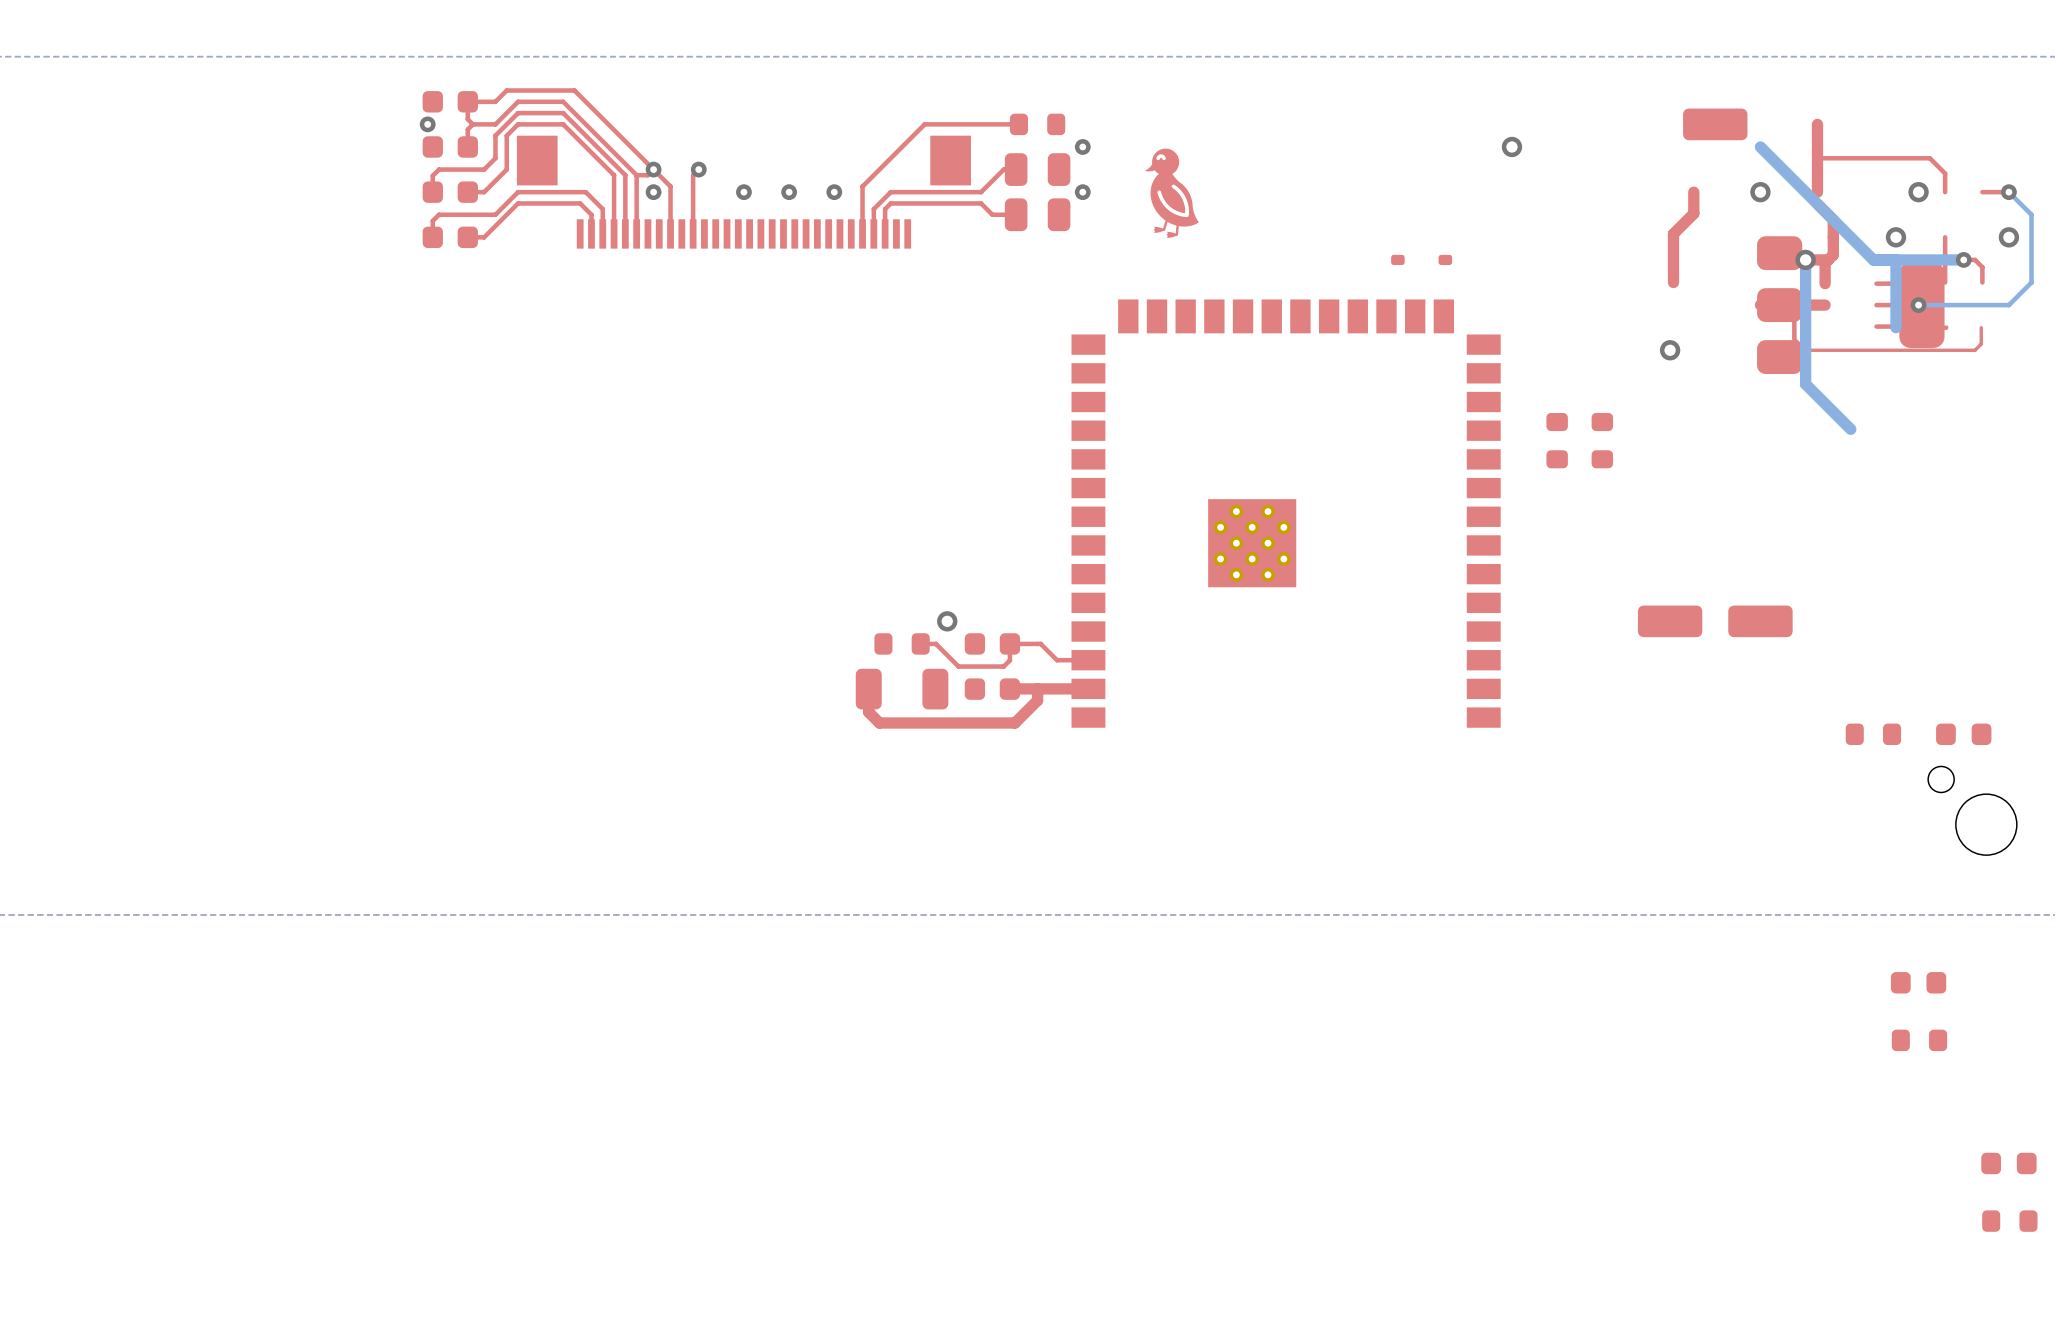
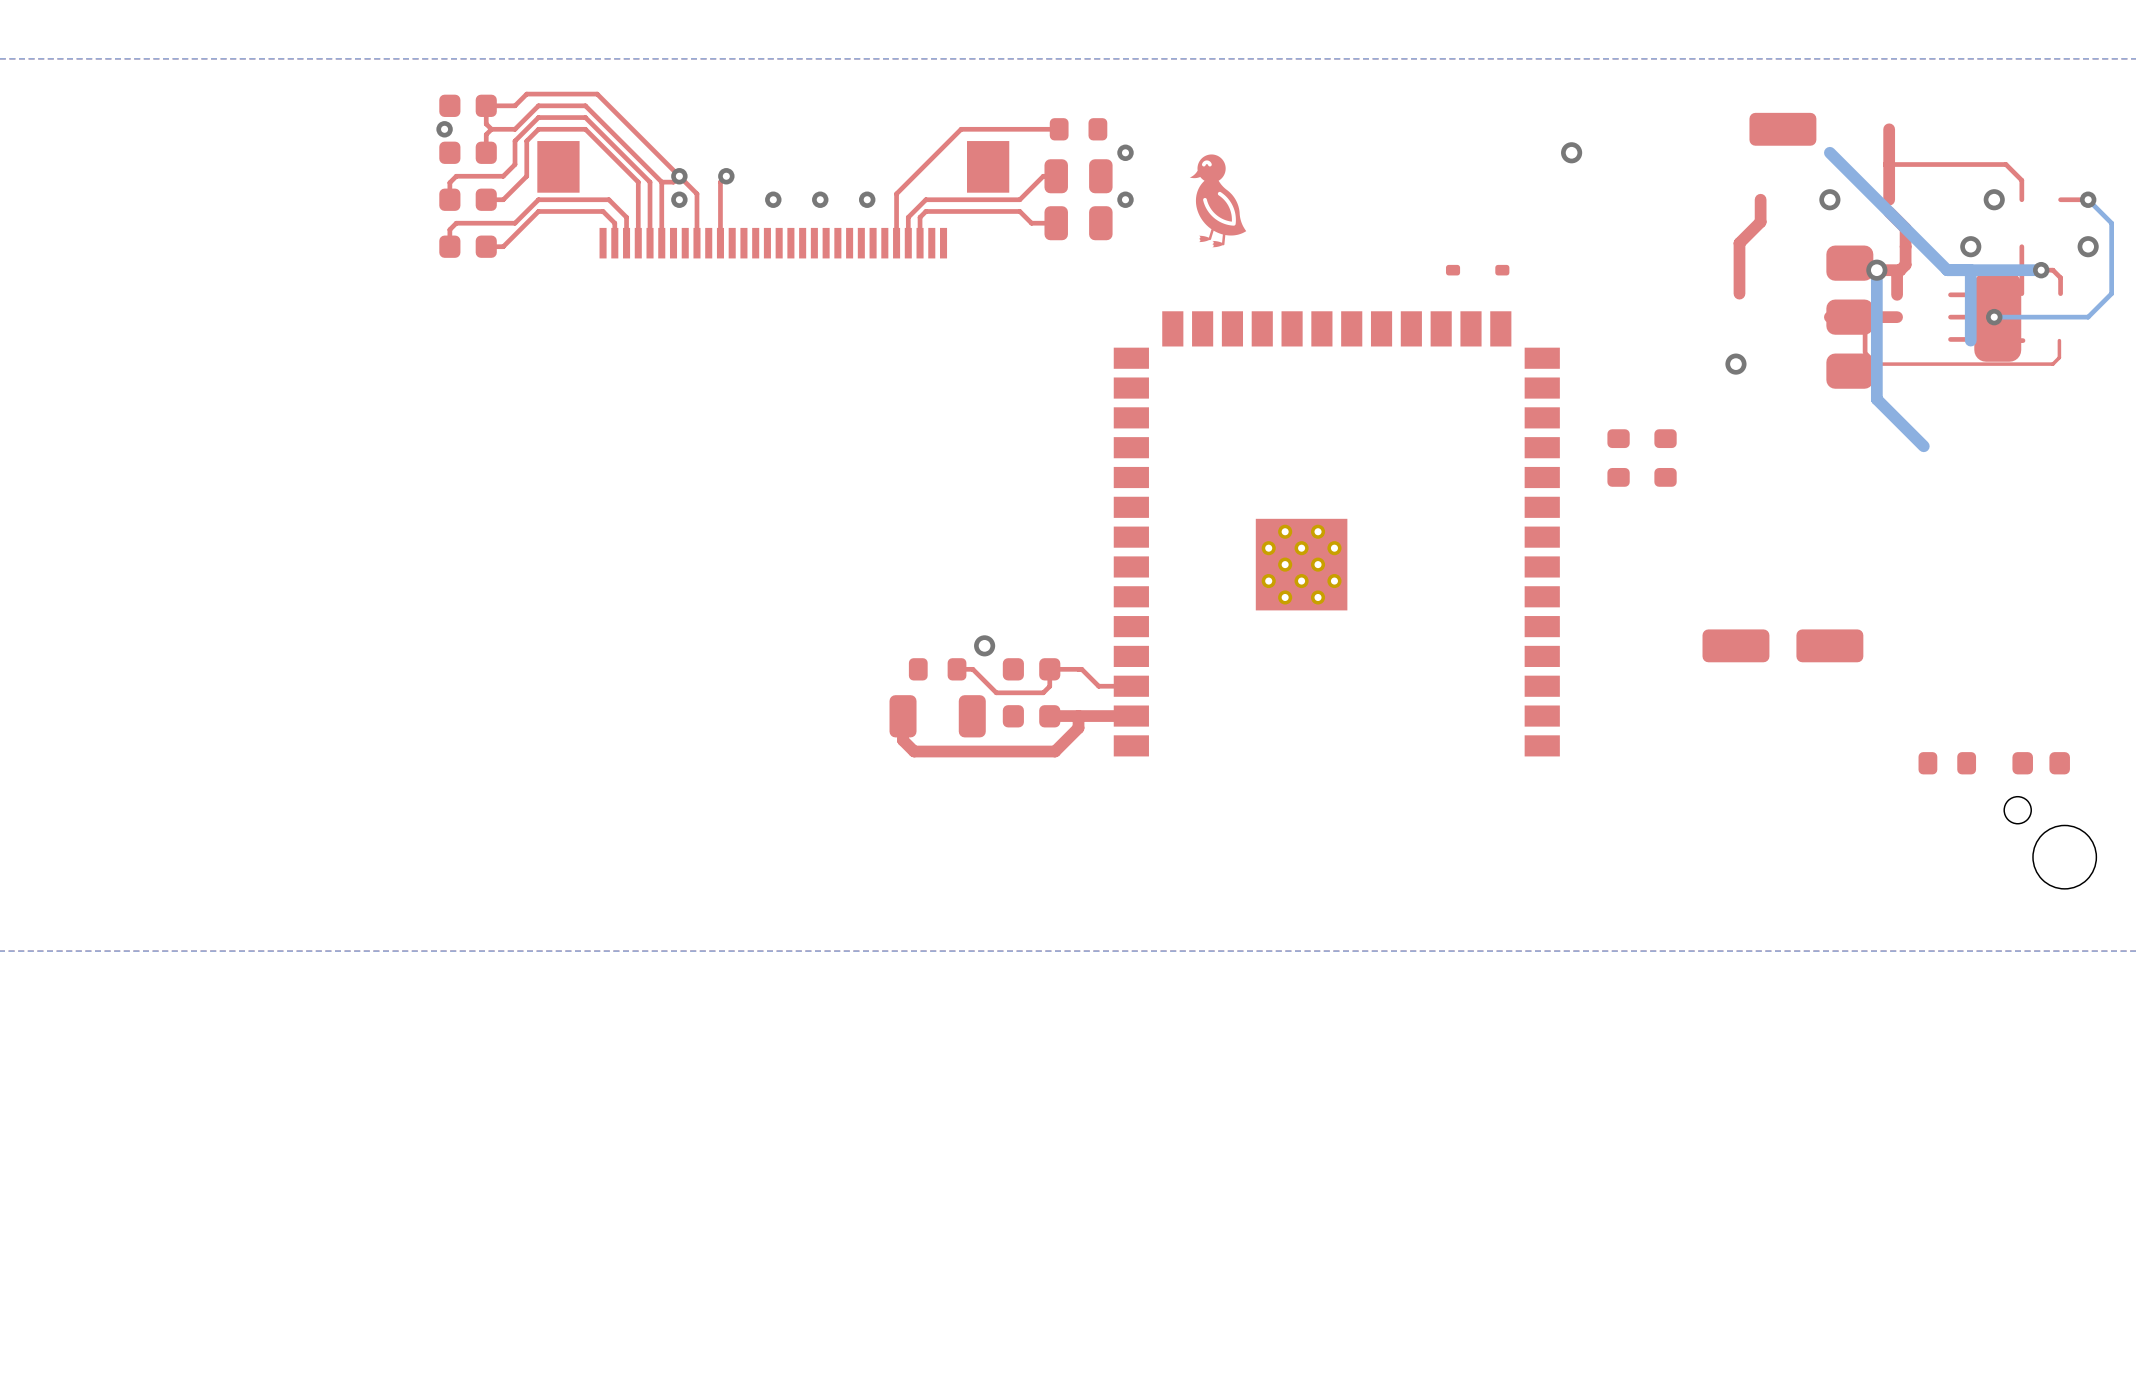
part: (1918, 982) -> none
part: (1919, 1040) -> none
part: (2008, 1163) -> none
part: (2009, 1221) -> none

